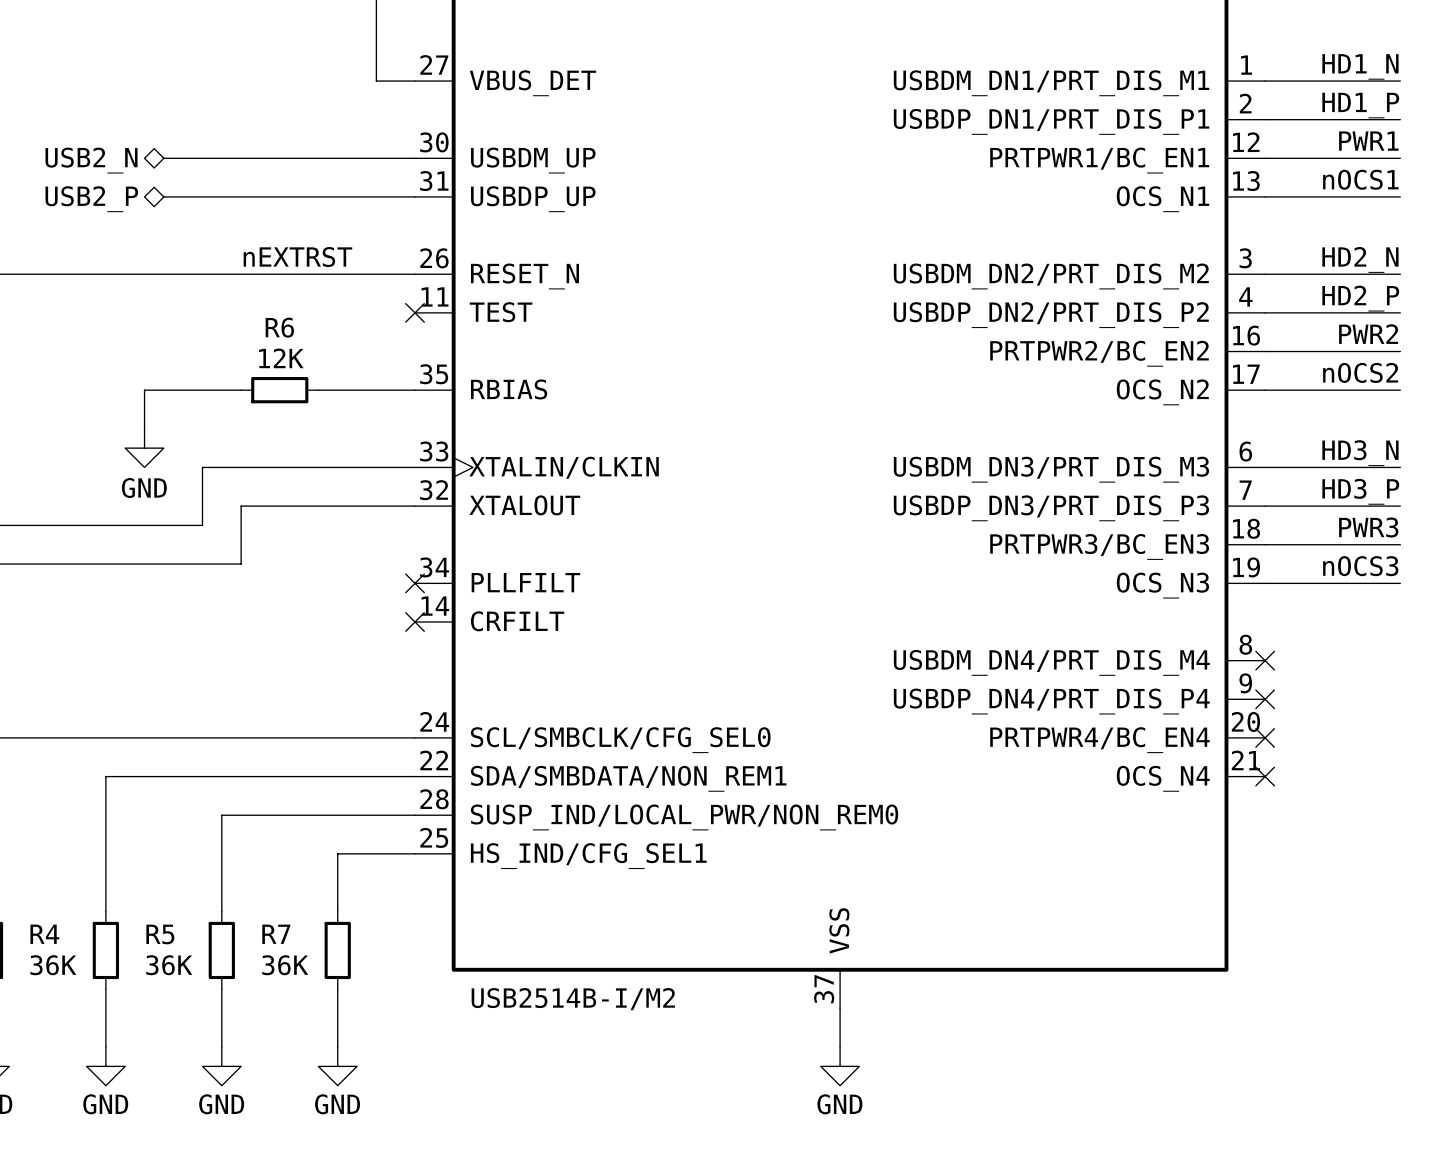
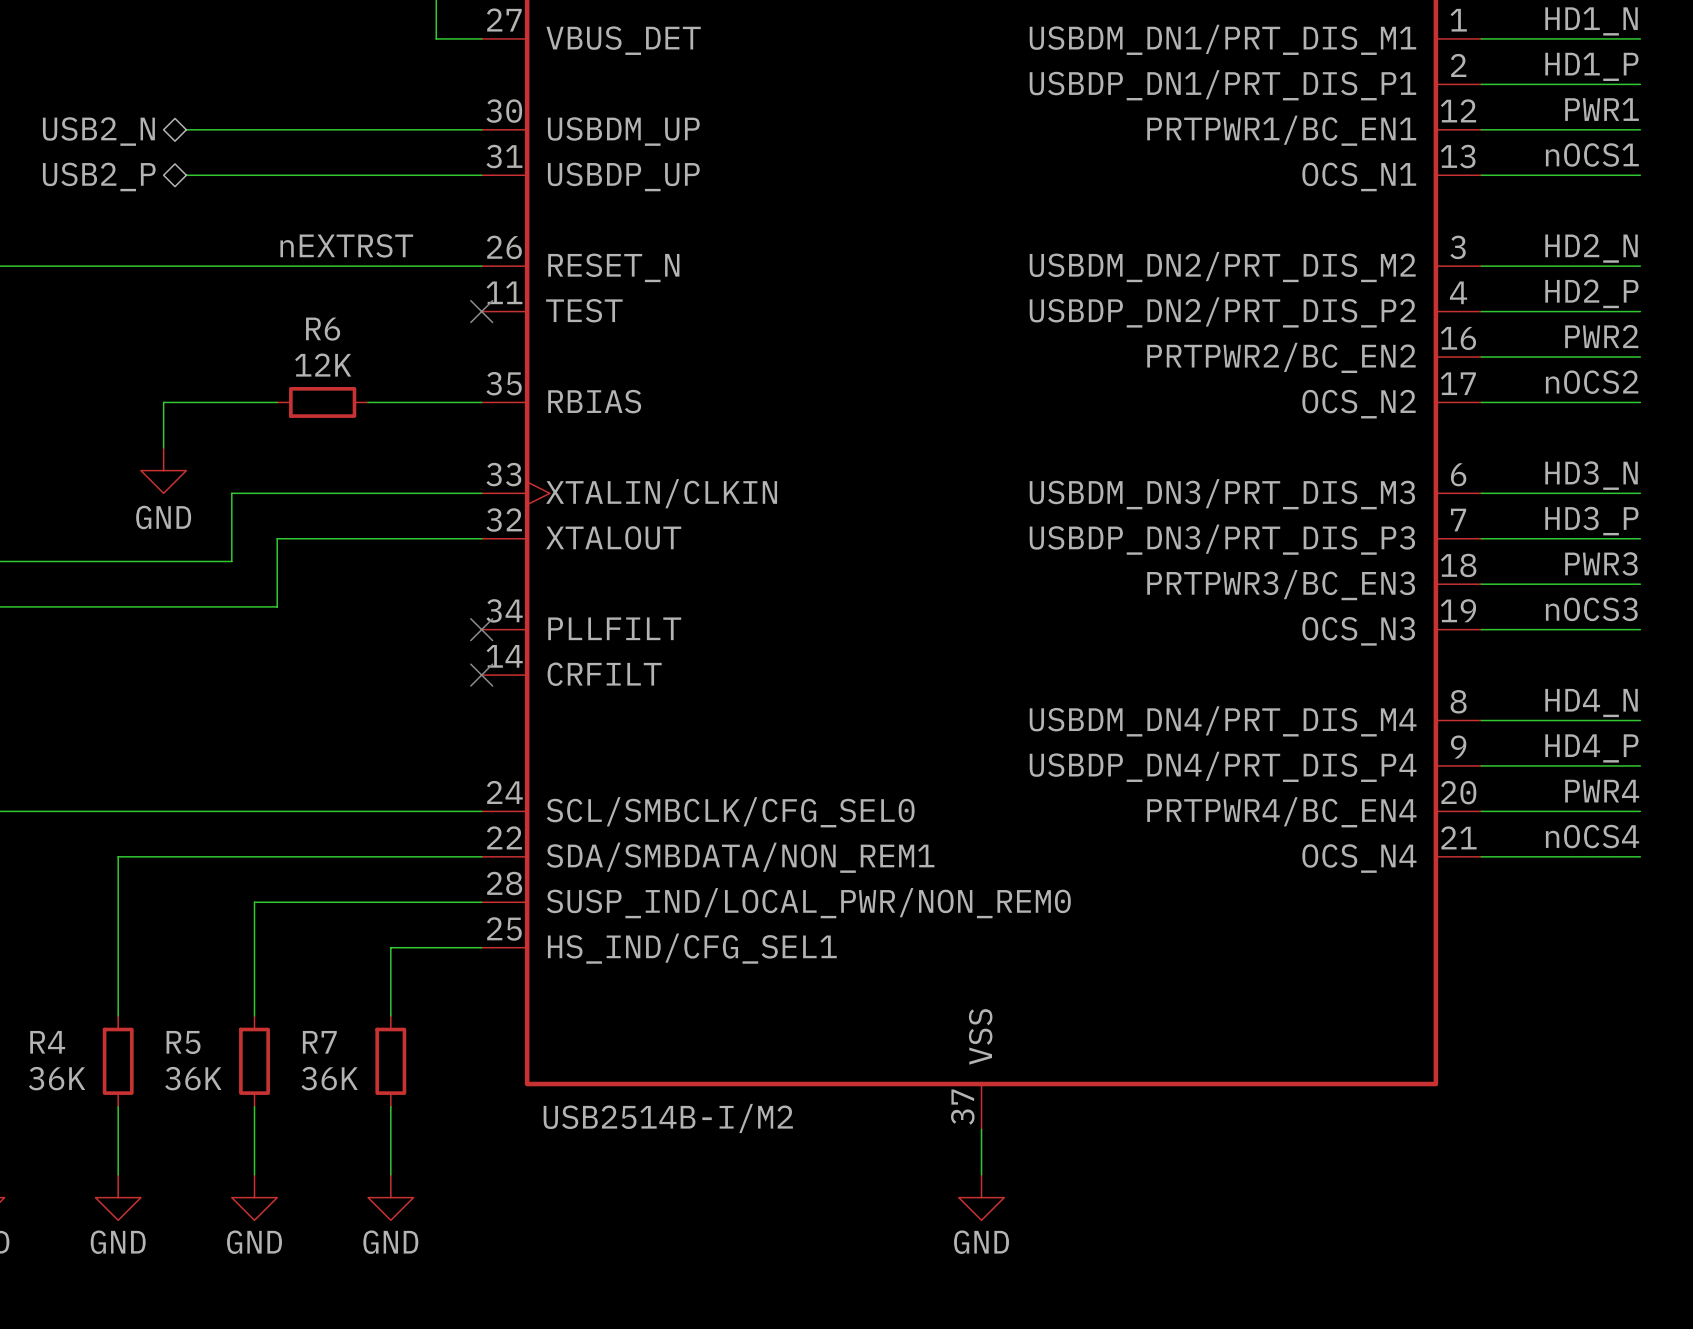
label: none -> HD4_N (1591, 703)
wire: none -> (1481, 720) (1640, 720)
no-connect mark: (1265, 660) -> none
label: none -> HD4_P (1591, 748)
wire: none -> (1481, 765) (1640, 765)
no-connect mark: (1265, 699) -> none
label: none -> PWR4 (1602, 791)
wire: none -> (1481, 811) (1640, 811)
no-connect mark: (1265, 737) -> none
label: none -> nOCS4 (1592, 836)
wire: none -> (1481, 856) (1640, 856)
no-connect mark: (1265, 776) -> none

